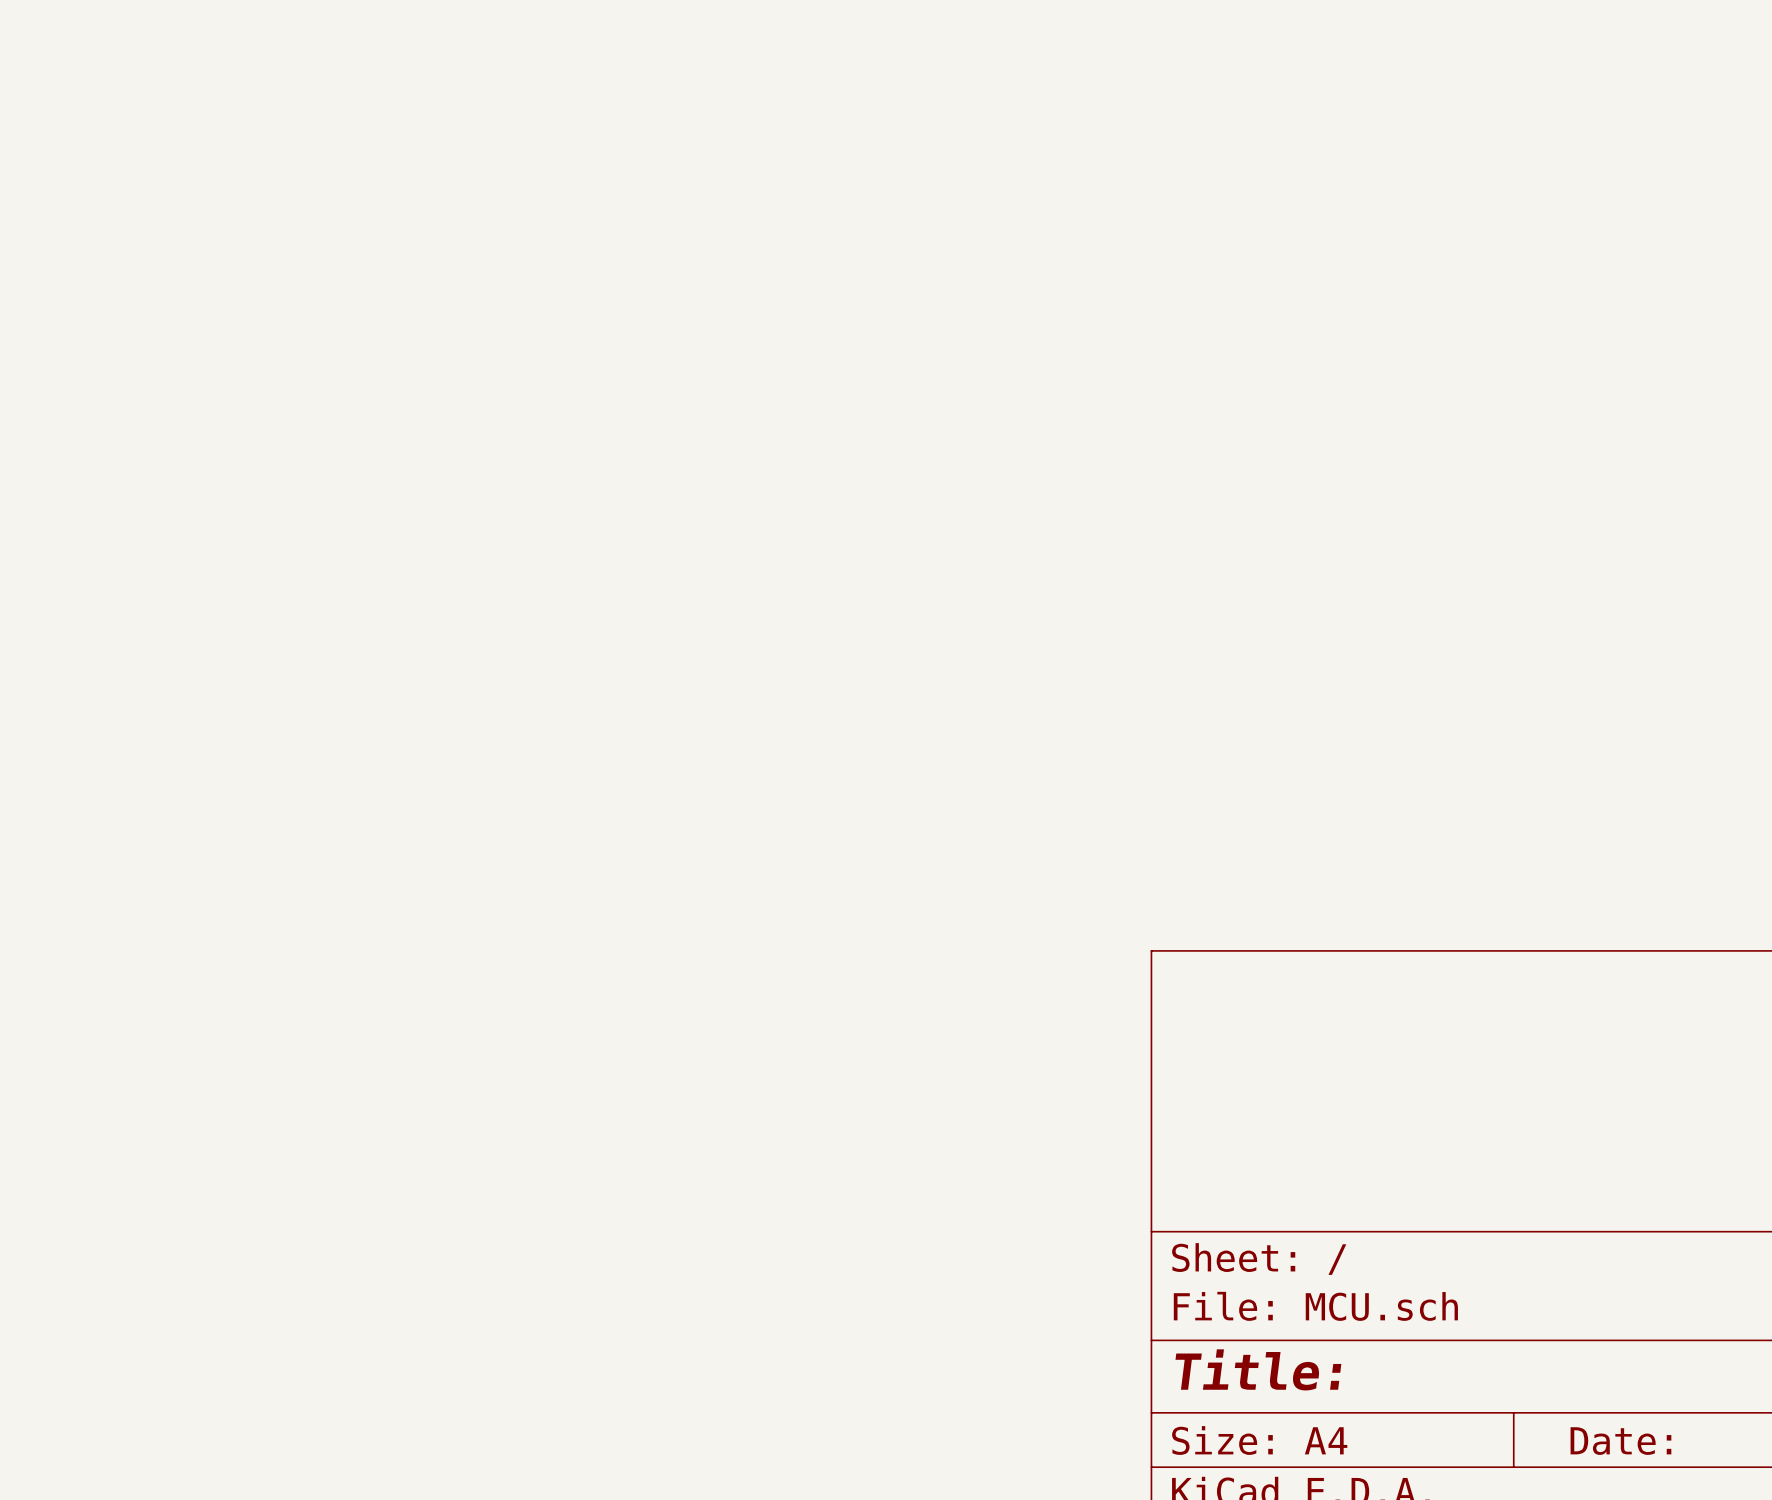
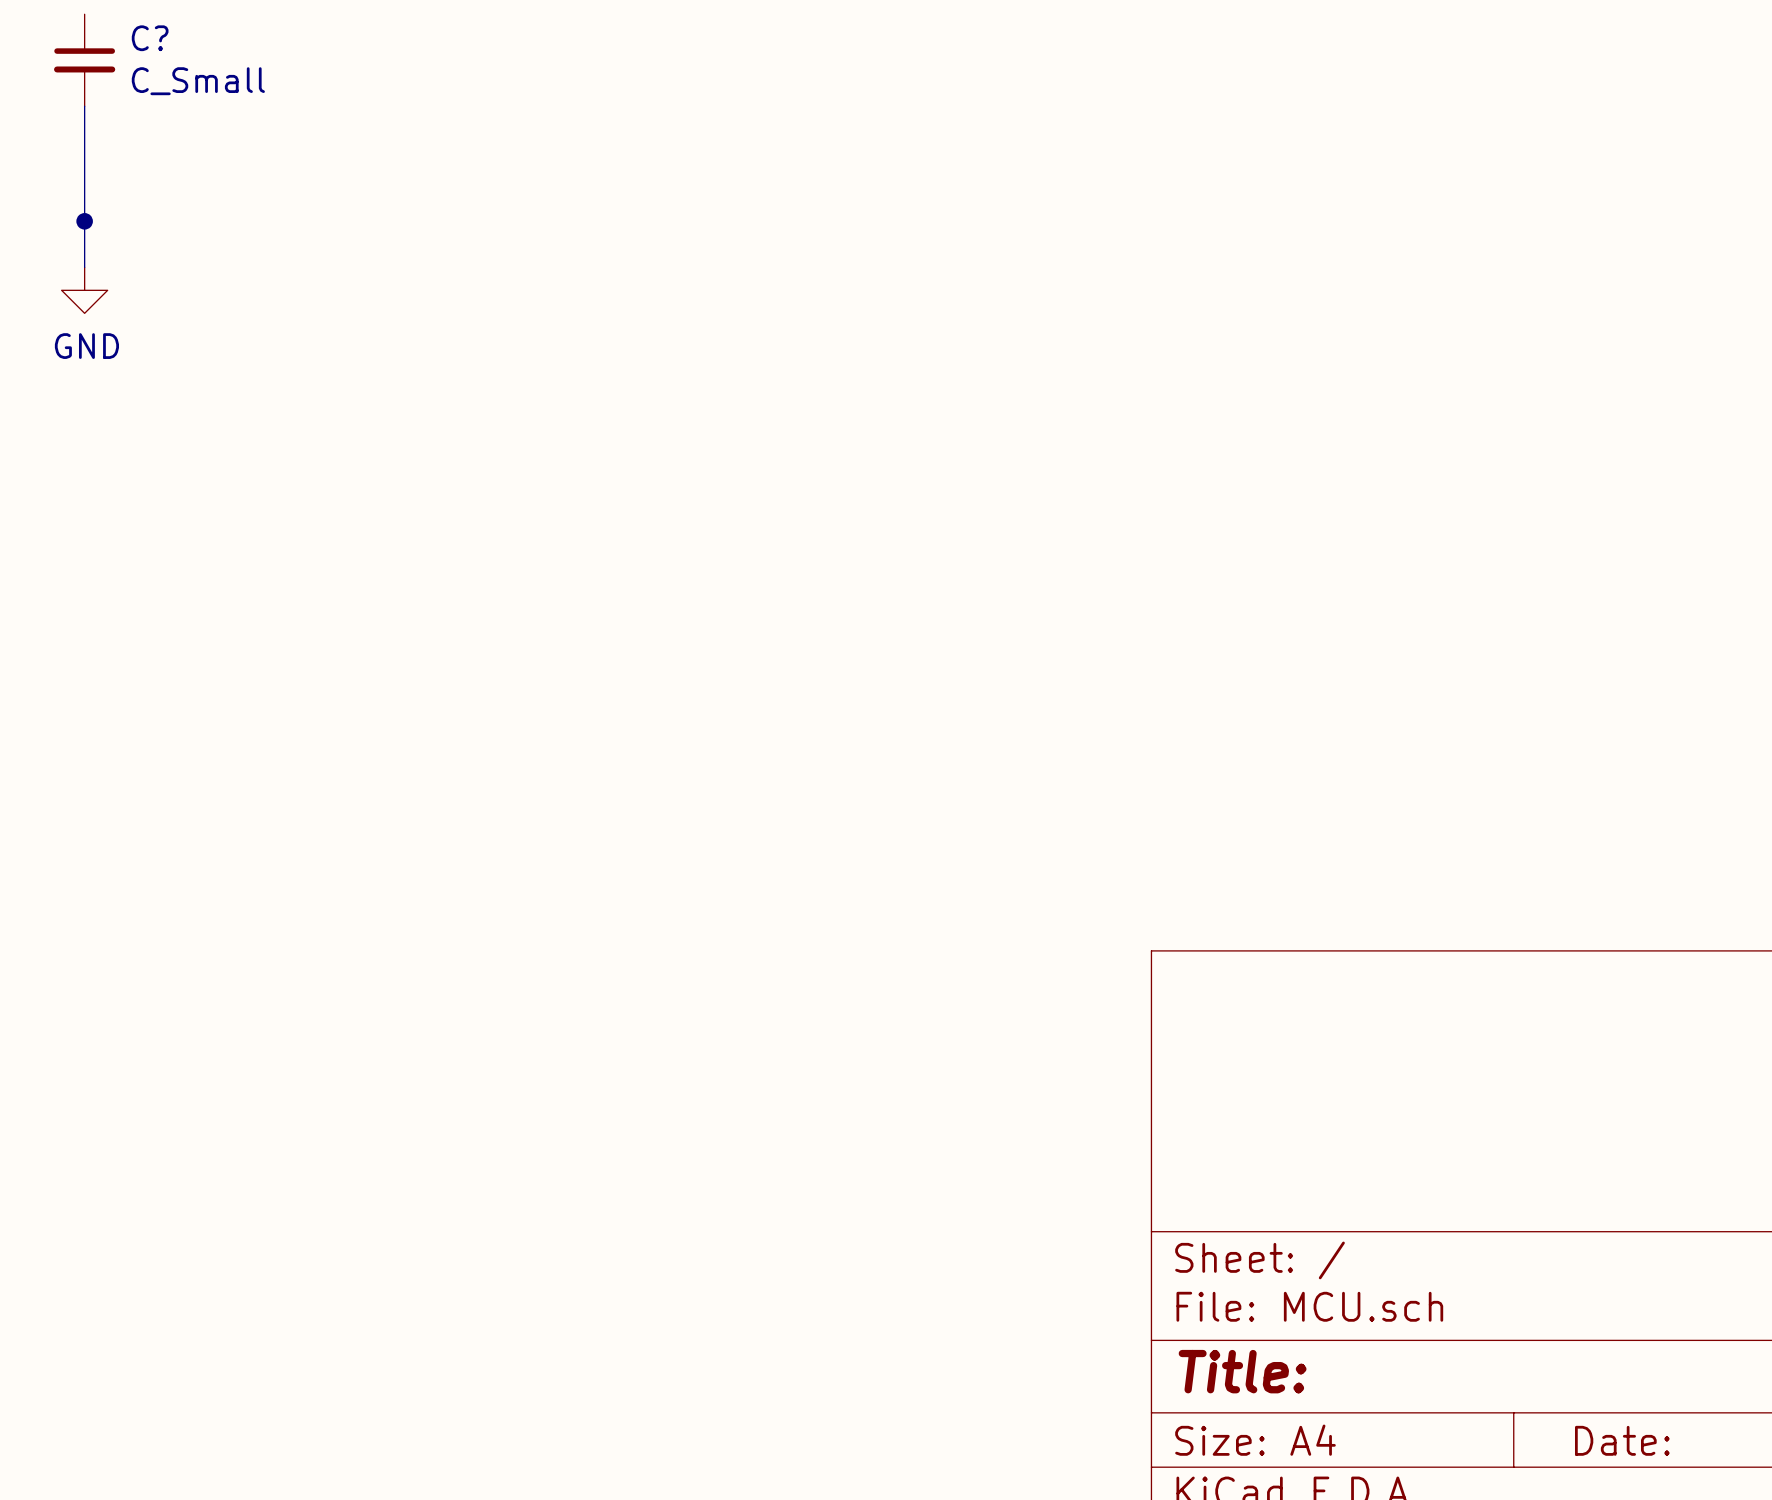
C?: none -> C_Small (84, 60)
wire: none -> (84, 106) (84, 267)
junction: none -> (84, 221)
power symbol: none -> GND (84, 290)

